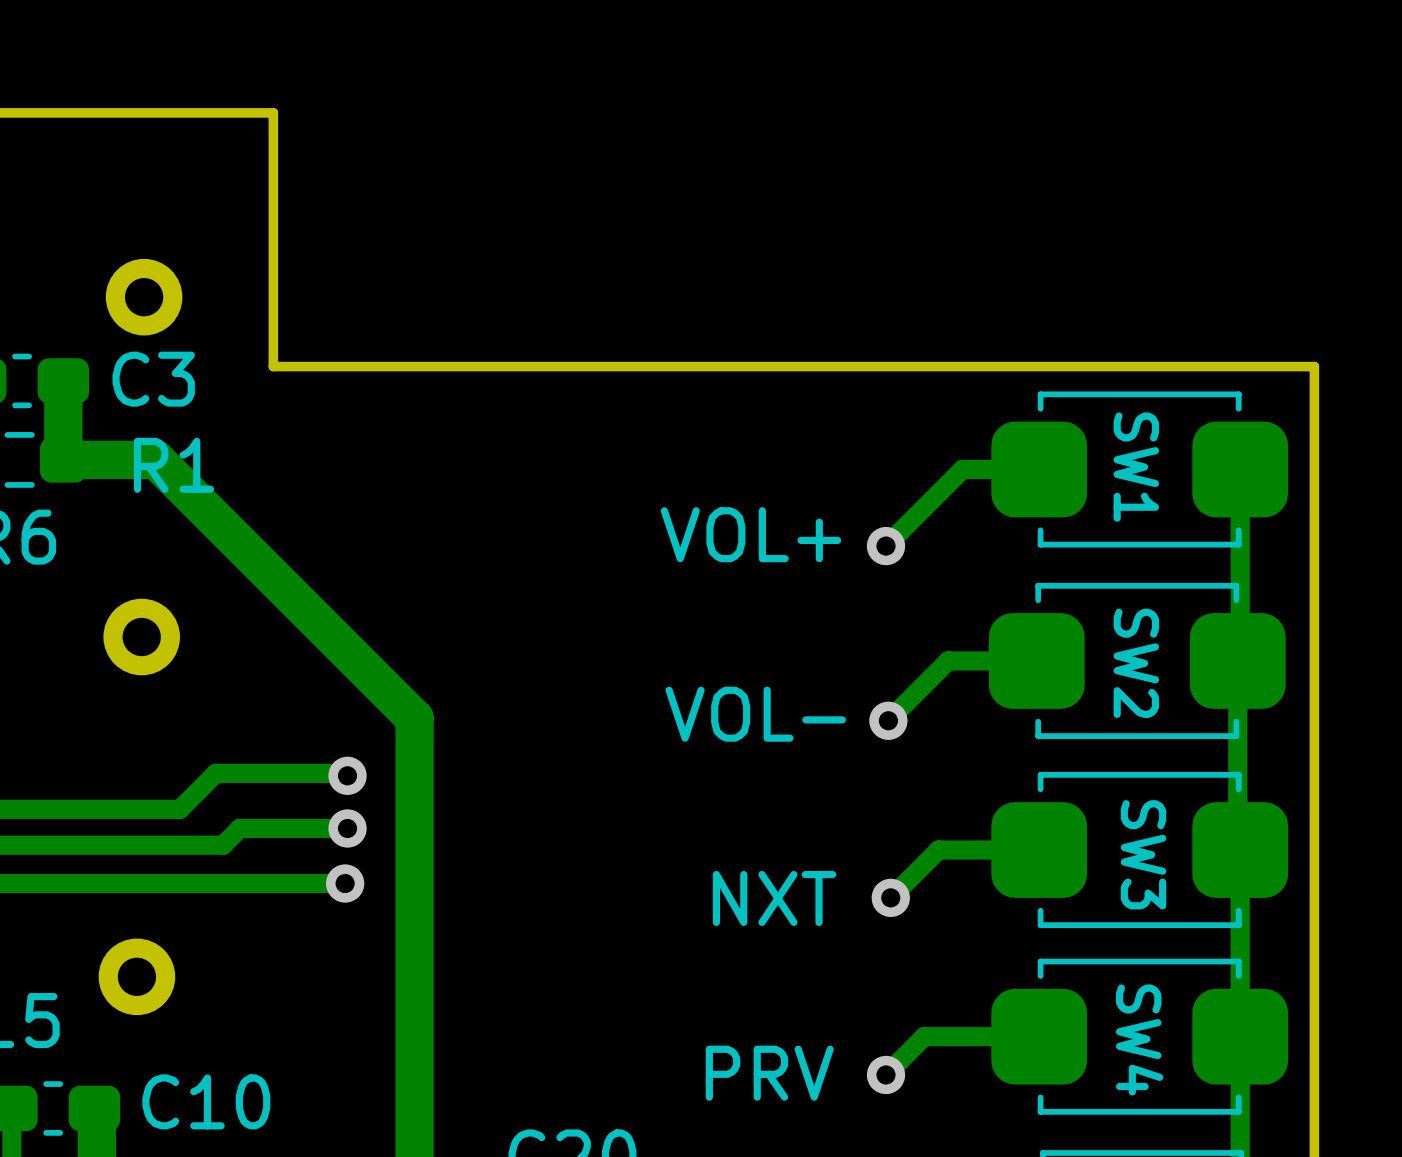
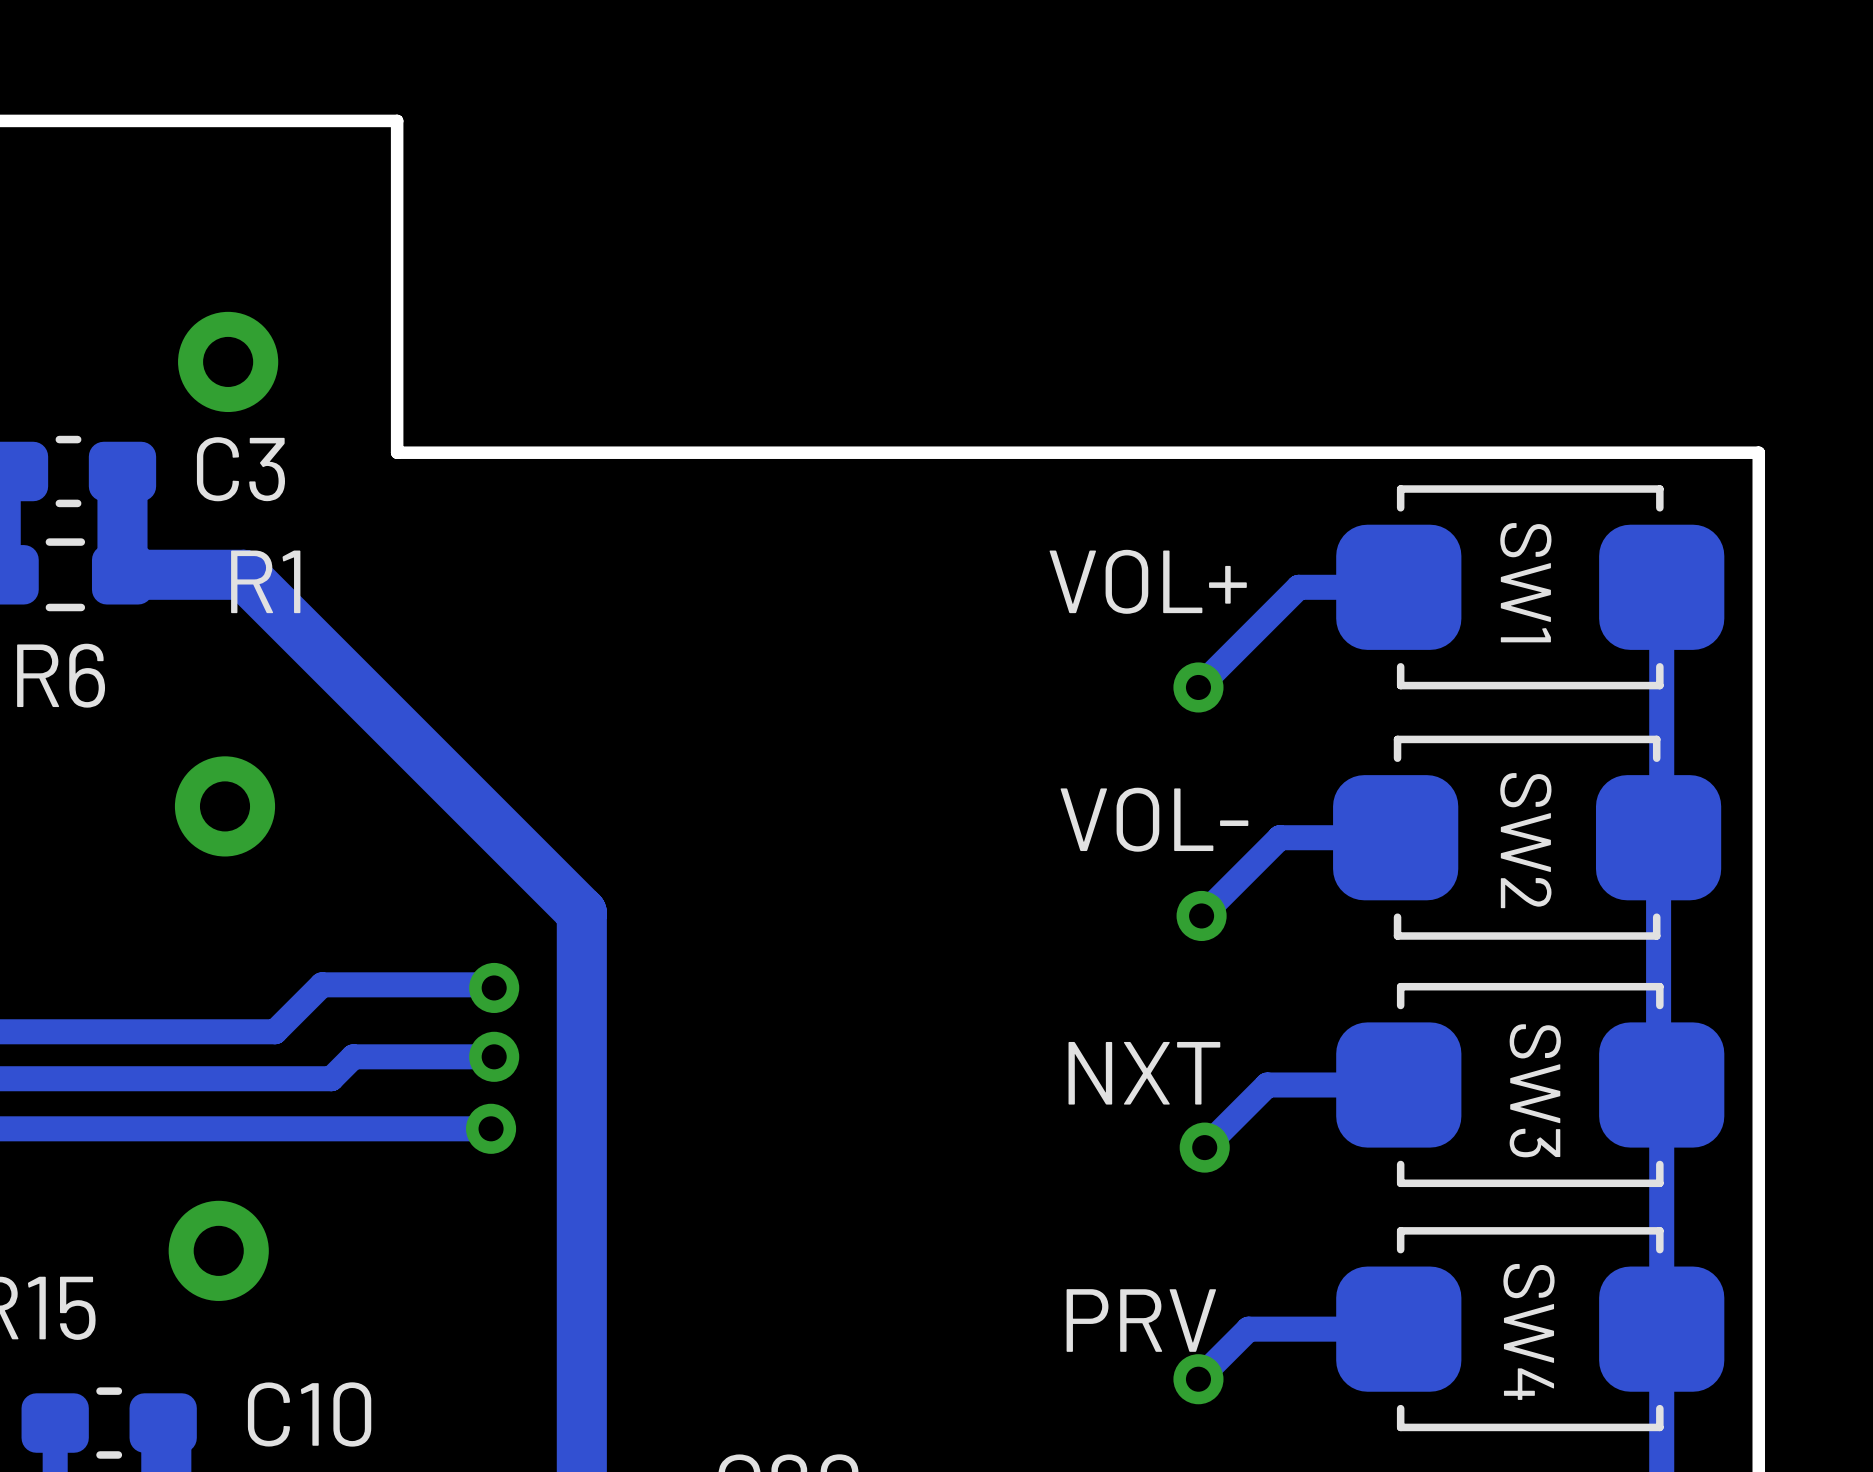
text position: VOL+ (750, 534) -> VOL+ (1148, 581)
text position: VOL- (755, 714) -> VOL- (1154, 819)
text position: NXT (774, 898) -> NXT (1144, 1073)
text position: PRV (769, 1073) -> PRV (1141, 1320)

